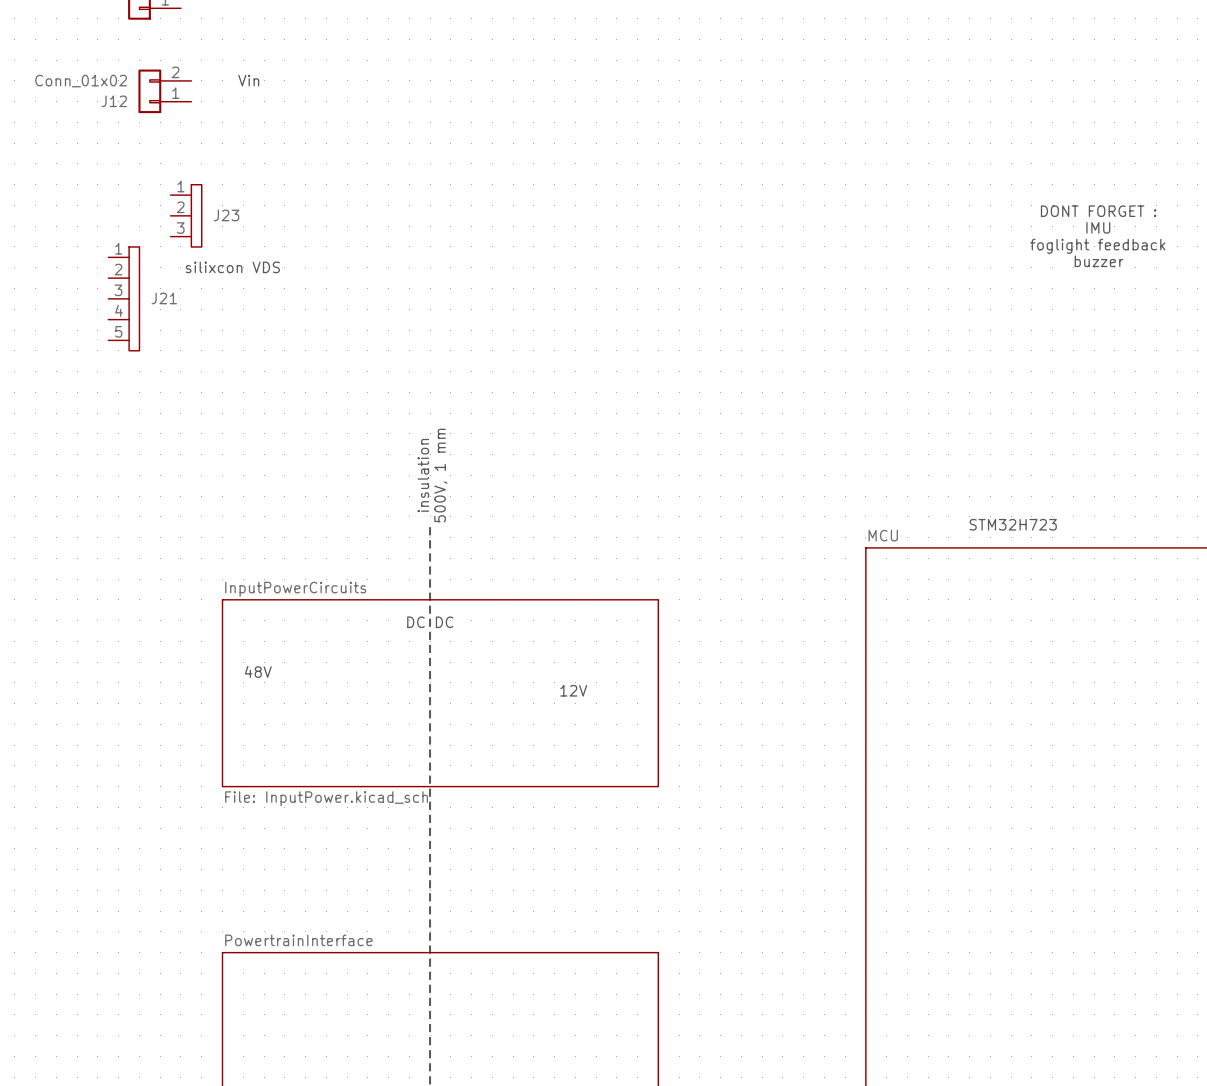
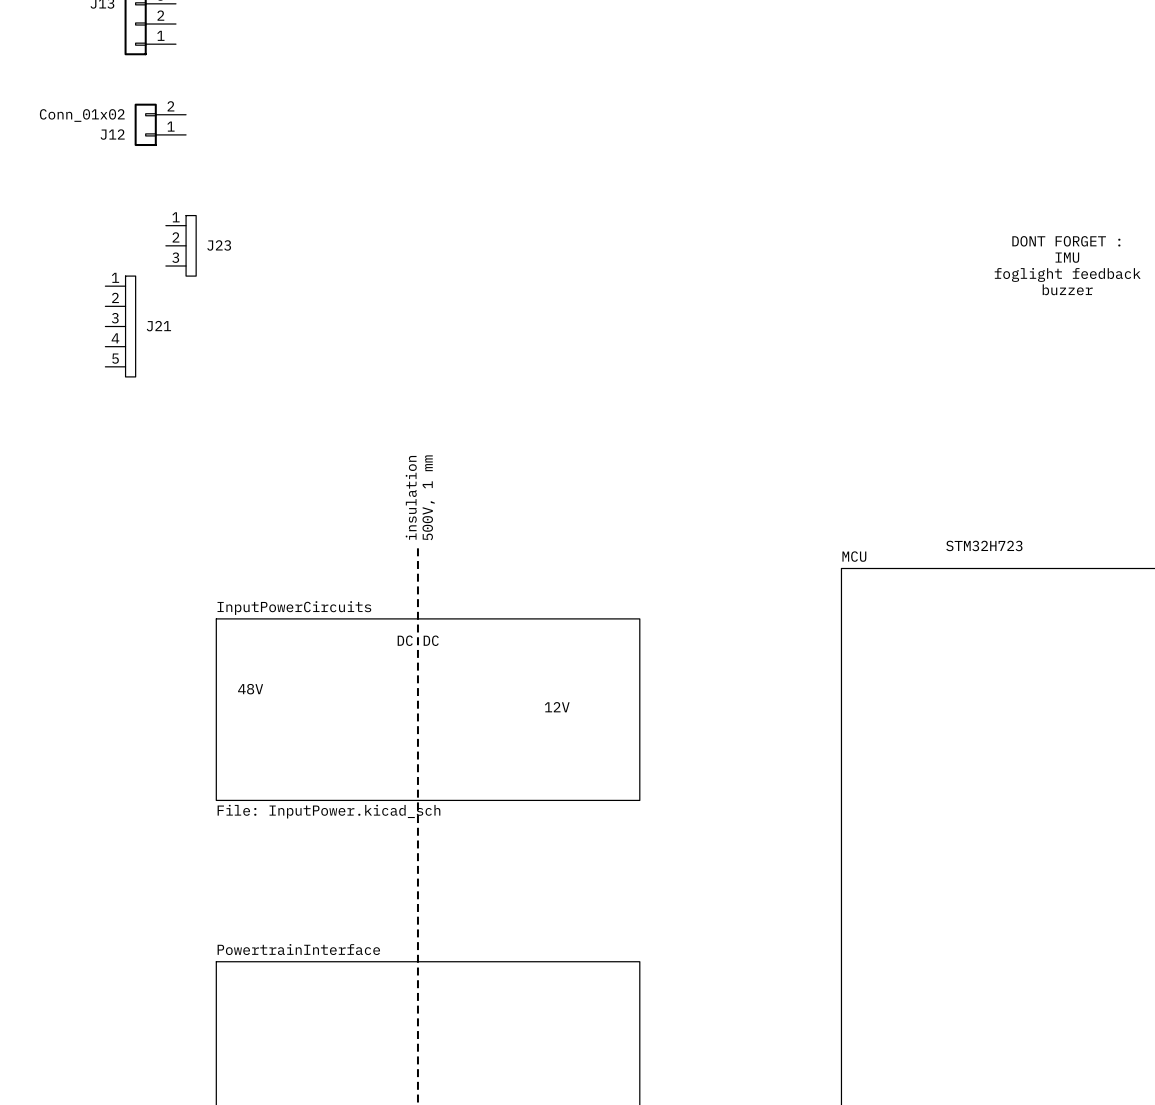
text: Vin (248, 80) -> none
text: silixcon VDS (232, 267) -> none

